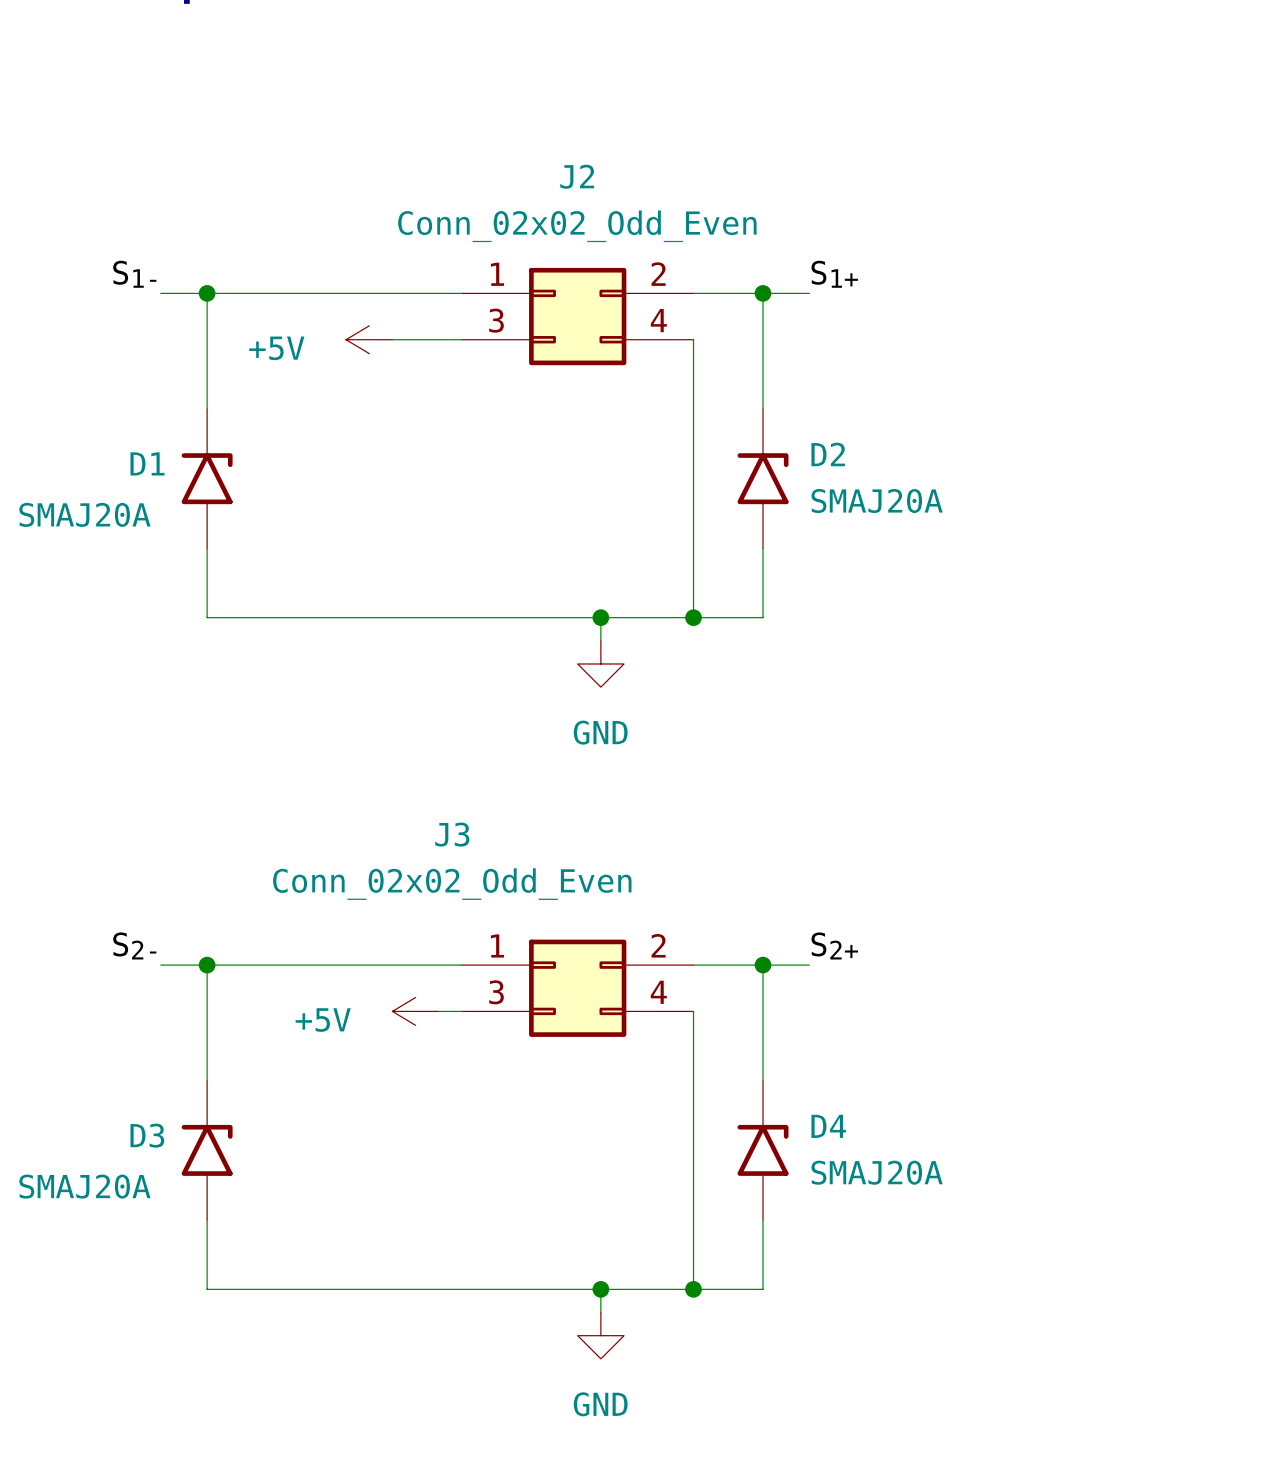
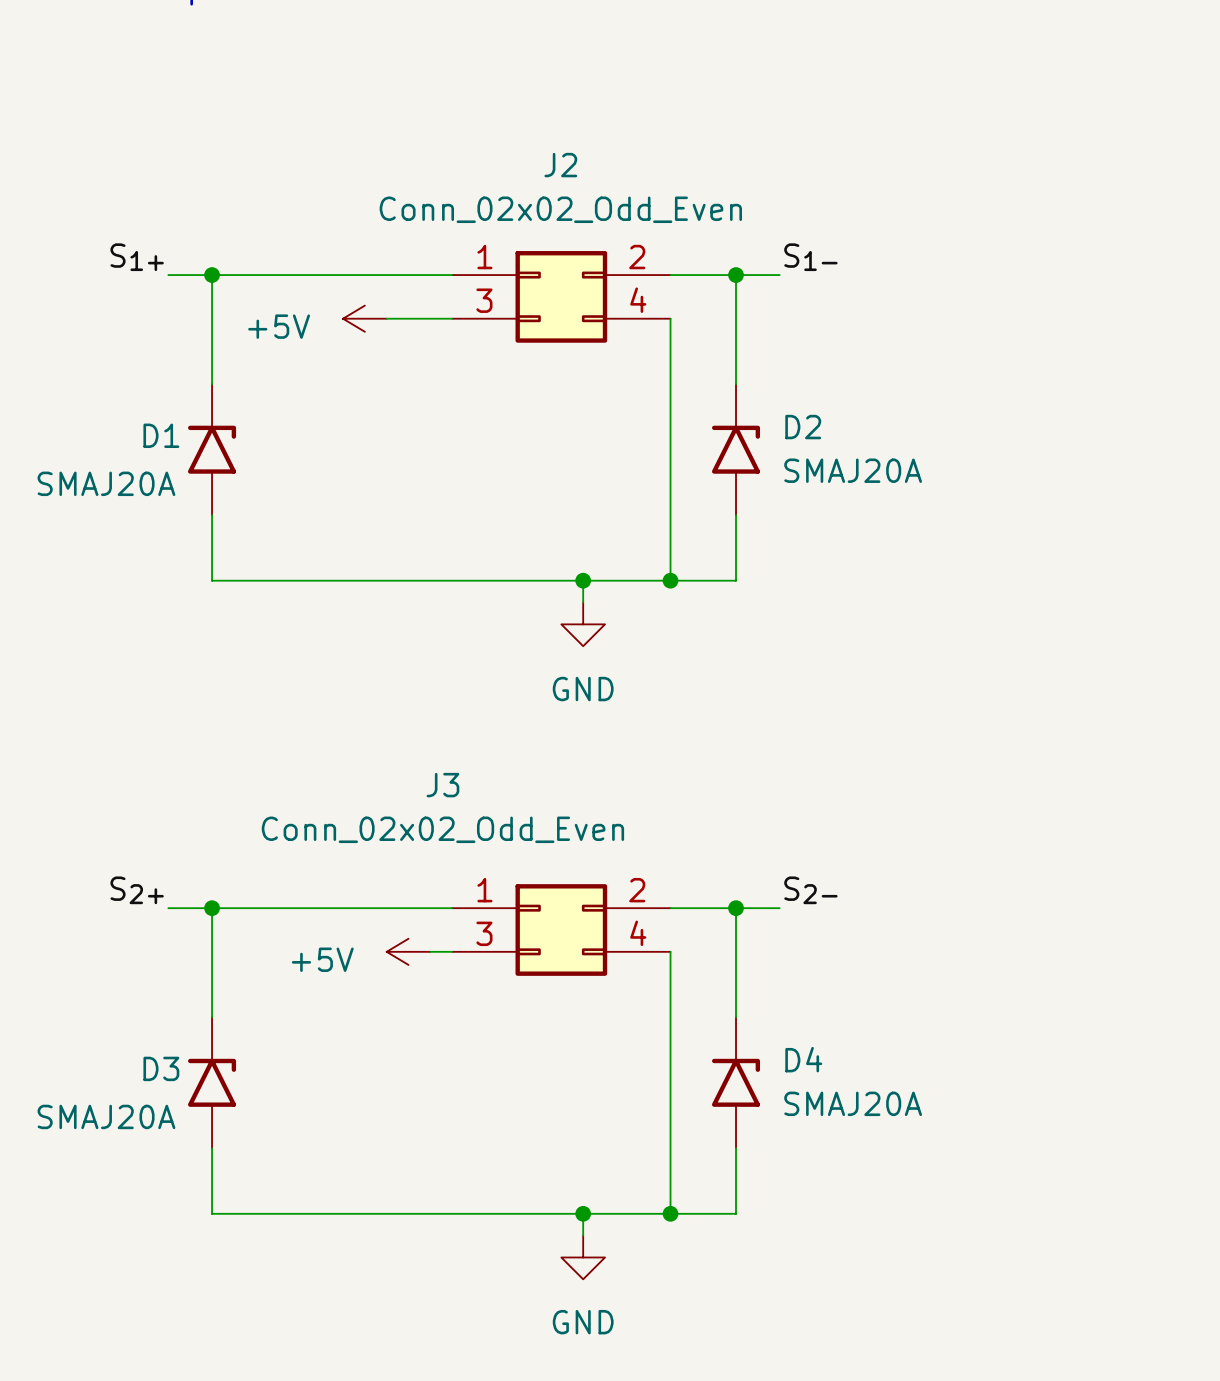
label: S1- (134, 274) -> S1+ (137, 257)
label: S1+ (834, 274) -> S1- (810, 257)
label: S2- (134, 945) -> S2+ (137, 890)
label: S2+ (834, 945) -> S2- (810, 890)

